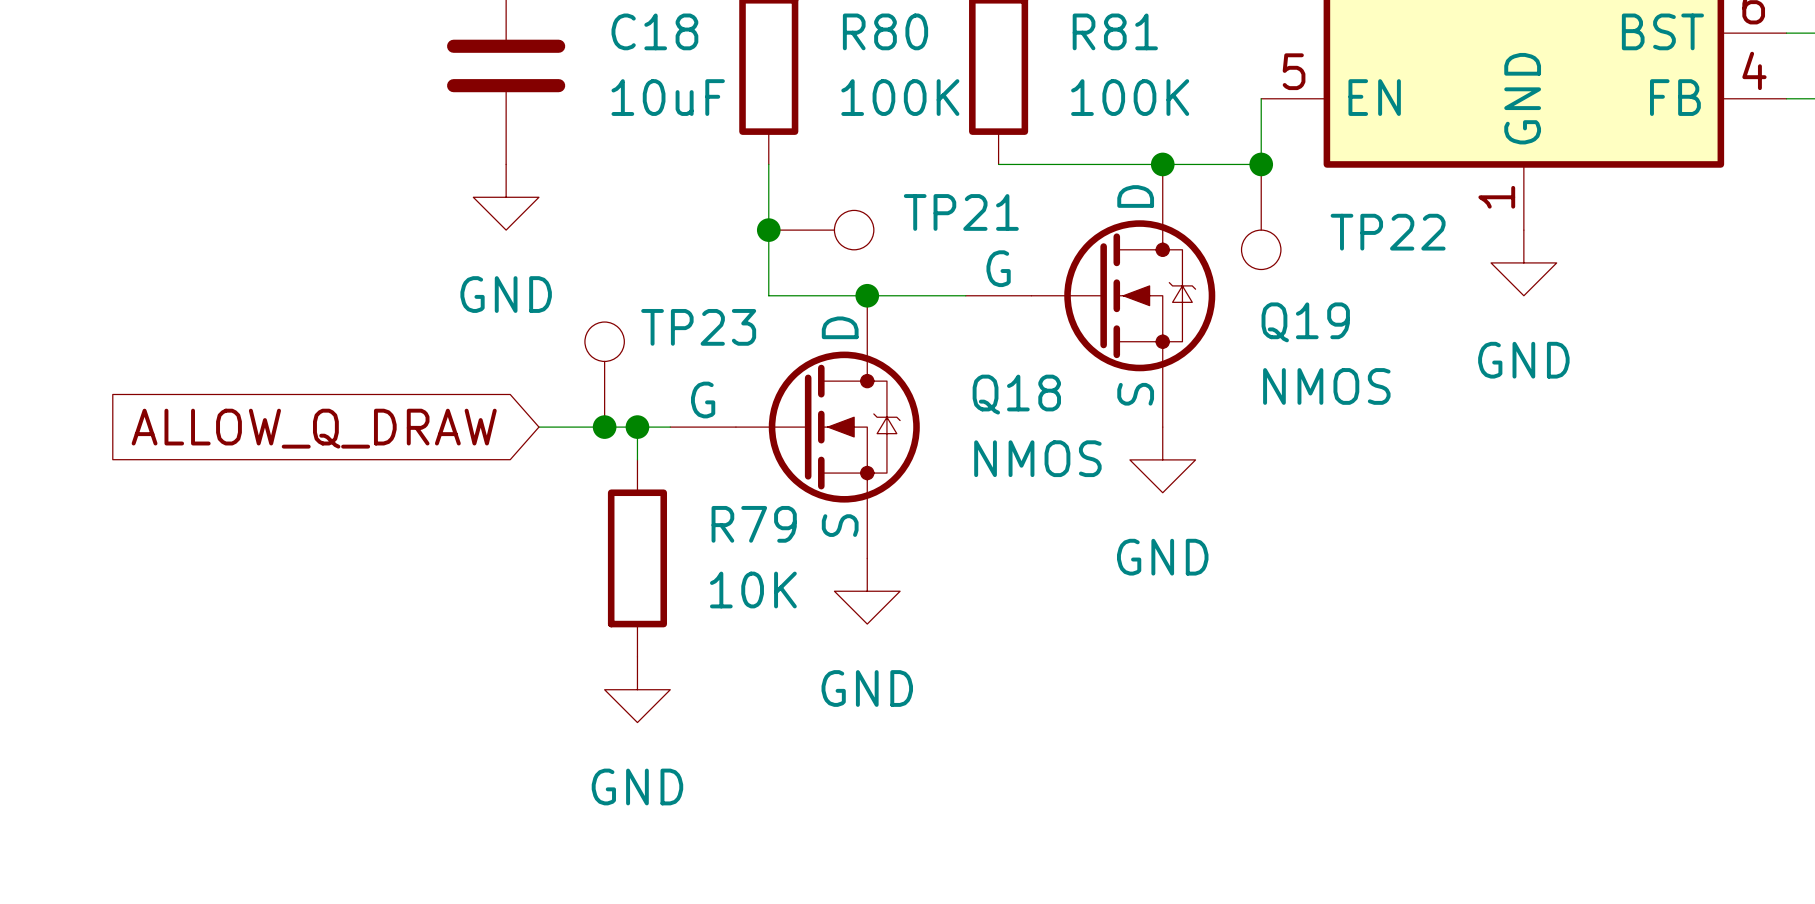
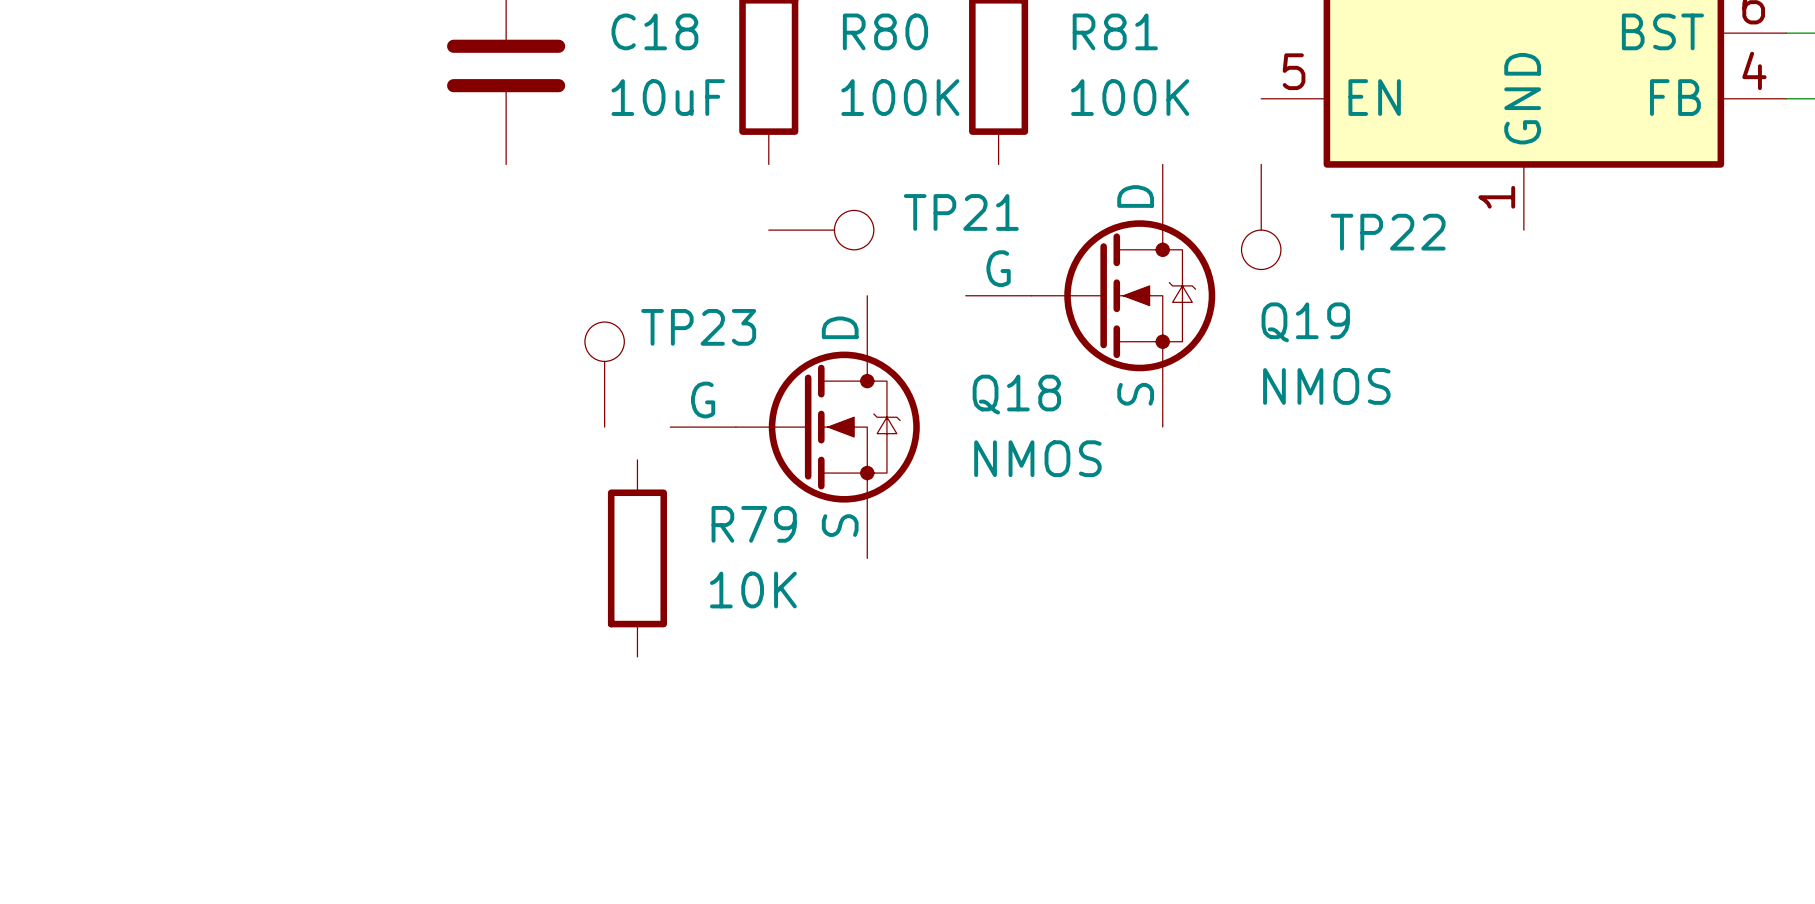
wire: (1261, 98) (1261, 164) (998, 164) -> none
wire: (768, 164) (768, 295) (965, 295) -> none
junction: (1162, 164) -> none
junction: (1261, 164) -> none
power symbol: GND (506, 197) -> none
junction: (768, 230) -> none
power symbol: GND (1523, 262) -> none
junction: (867, 295) -> none
wire: (538, 427) (670, 427) -> none
junction: (604, 427) -> none
wire: (637, 427) (637, 459) -> none
junction: (637, 427) -> none
global label: ALLOW_Q_DRAW (314, 428) -> none
power symbol: GND (1162, 459) -> none
power symbol: GND (867, 591) -> none
power symbol: GND (637, 689) -> none

